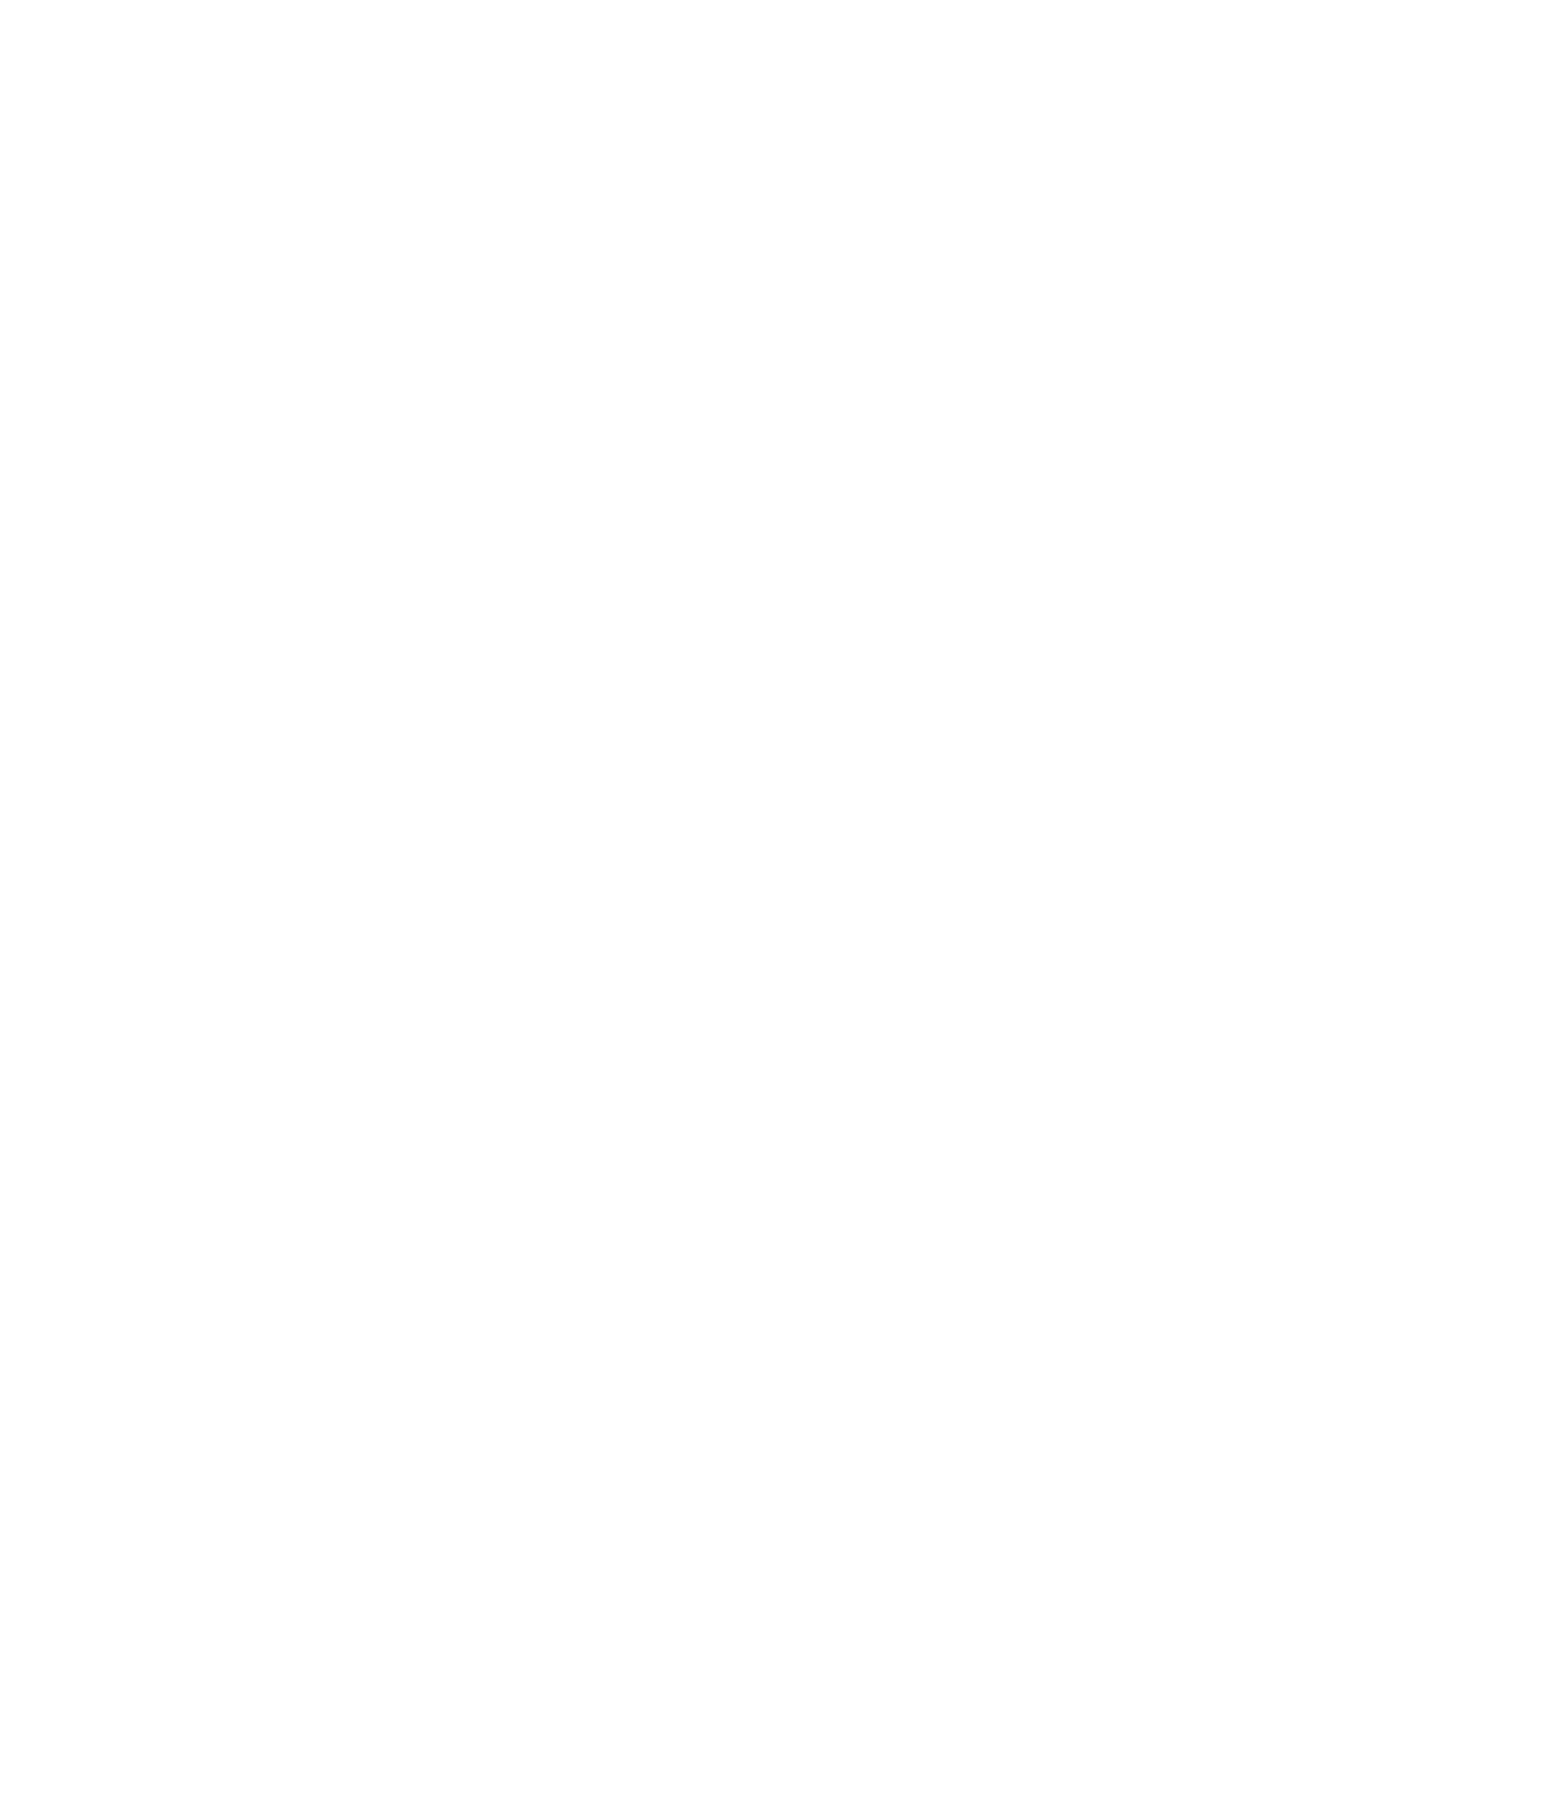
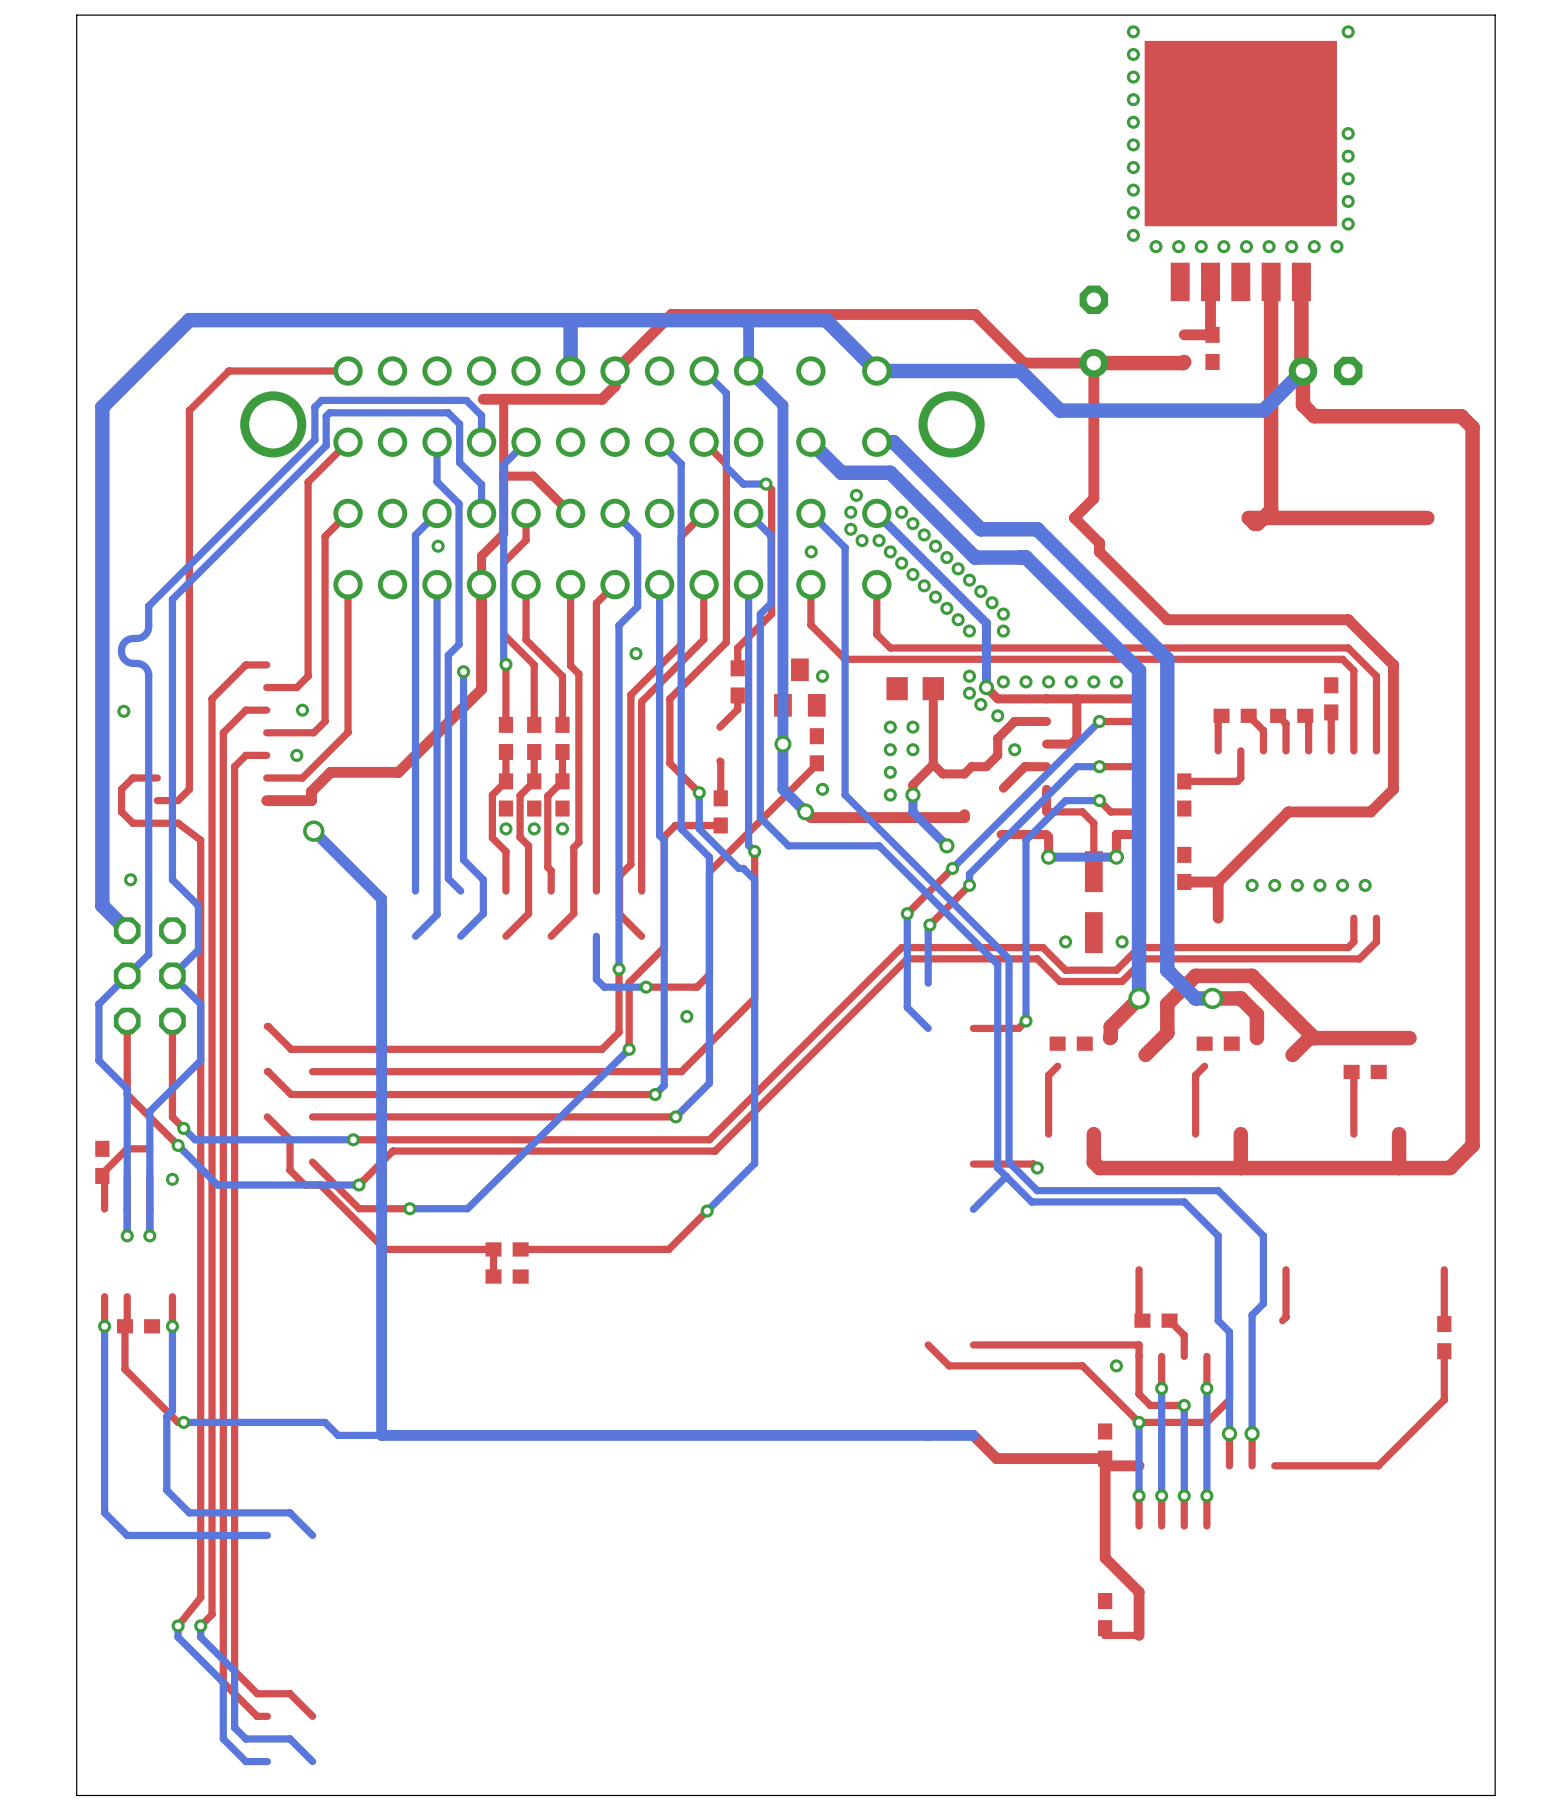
board edge: none -> (1495, 15) (76, 15) (76, 1795) (1495, 1795) (1495, 15)
via: none -> (1133, 31)
via: none -> (1348, 31)
via: none -> (1133, 54)
via: none -> (1133, 77)
via: none -> (1133, 99)
via: none -> (1133, 122)
via: none -> (1348, 133)
via: none -> (1133, 144)
via: none -> (1348, 156)
via: none -> (1133, 167)
part: none -> (1240, 171)
via: none -> (1348, 178)
via: none -> (1133, 190)
via: none -> (1348, 201)
via: none -> (1133, 212)
via: none -> (1348, 224)
via: none -> (1133, 235)
via: none -> (1156, 246)
via: none -> (1178, 246)
via: none -> (1201, 246)
via: none -> (1223, 246)
via: none -> (1246, 246)
via: none -> (1269, 246)
via: none -> (1291, 246)
via: none -> (1314, 246)
via: none -> (1336, 246)
top track: none -> (1210, 281) (1210, 331) (1212, 334) (1184, 334)
top track: none -> (1271, 281) (1271, 510) (1257, 523) (1254, 523) (1248, 517) (1427, 517)
top track: none -> (1301, 281) (1302, 404) (1314, 416) (1461, 416) (1472, 427) (1472, 1145) (1449, 1168) (1099, 1168) (1093, 1162) (1093, 1134)
bottom track: none -> (568, 320) (570, 322) (570, 371)
bottom track: none -> (743, 320) (748, 325) (748, 371) (782, 405) (782, 789) (805, 811)
part: none -> (1093, 331)
part: none -> (1212, 348)
top track: none -> (1184, 361) (1093, 363)
top track: none -> (1093, 363) (1093, 498) (1074, 517) (1099, 543) (1099, 551) (1167, 619) (1348, 619) (1393, 664) (1393, 789) (1370, 811) (1288, 811) (1218, 882)
top track: none -> (1093, 363) (1023, 363) (975, 314) (671, 314) (615, 371) (615, 386) (602, 399) (481, 399)
top track: none -> (348, 371) (228, 371) (189, 410) (189, 789) (178, 800) (157, 800)
bottom track: none -> (704, 371) (726, 393) (726, 467) (743, 484) (765, 484)
bottom track: none -> (1302, 371) (1263, 410) (1059, 410) (1020, 371) (876, 371) (825, 320) (189, 320) (102, 407) (102, 905) (127, 930)
part: none -> (1325, 371)
top track: none -> (503, 399) (503, 533) (481, 555) (481, 689) (398, 772) (330, 772) (311, 791) (311, 800) (266, 800)
top track: none -> (348, 442) (308, 482) (308, 676) (296, 687) (266, 687)
bottom track: none -> (437, 442) (437, 481) (459, 503) (459, 644) (448, 655) (448, 878) (460, 891)
bottom track: none -> (481, 442) (481, 415) (466, 400) (321, 400) (314, 407) (314, 439) (148, 606) (148, 628) (145, 634) (139, 638) (128, 639) (122, 645) (121, 653) (124, 659) (142, 665) (148, 673) (148, 954) (98, 1004) (98, 1060) (127, 1088) (127, 1235)
bottom track: none -> (526, 442) (503, 464) (503, 662) (505, 664)
bottom track: none -> (659, 442) (681, 463) (681, 828) (709, 857) (709, 1083) (675, 1116)
top track: none -> (704, 442) (726, 464) (726, 642) (669, 698) (669, 763) (699, 792)
bottom track: none -> (810, 442) (841, 472) (890, 472) (975, 557) (1025, 557) (1139, 670) (1139, 998)
bottom track: none -> (876, 442) (893, 442) (980, 529) (1037, 529) (1167, 659) (1167, 970) (1195, 998) (1212, 998)
top track: none -> (503, 476) (533, 476) (570, 513)
part: none -> (612, 477)
top track: none -> (765, 484) (771, 489) (771, 614) (737, 647) (737, 668)
via: none -> (765, 484)
via: none -> (856, 495)
via: none -> (850, 512)
via: none -> (901, 512)
top track: none -> (348, 513) (325, 536) (325, 721) (313, 732) (266, 732)
bottom track: none -> (437, 513) (415, 534) (415, 891)
bottom track: none -> (481, 513) (481, 484) (459, 462) (459, 424) (448, 412) (329, 412) (326, 416) (326, 445) (172, 599) (172, 879) (198, 905) (198, 949) (172, 975) (200, 1004) (200, 1060) (149, 1111) (149, 1235)
top track: none -> (526, 513) (526, 540) (503, 562) (503, 634) (534, 664) (534, 724)
bottom track: none -> (615, 513) (637, 536) (637, 606) (619, 625) (619, 969)
top track: none -> (704, 513) (681, 536) (681, 644) (630, 694) (630, 864) (619, 875) (619, 914) (641, 936)
bottom track: none -> (748, 513) (771, 535) (771, 603) (760, 614) (760, 817) (788, 845) (879, 845) (997, 964) (997, 1168) (1031, 1201) (1184, 1201) (1218, 1235) (1218, 1320) (1229, 1331) (1229, 1433)
bottom track: none -> (810, 513) (845, 547) (845, 794) (1009, 958) (1009, 1162) (1037, 1190) (1218, 1190) (1263, 1235) (1263, 1303) (1252, 1315) (1252, 1433)
bottom track: none -> (876, 513) (986, 623) (986, 687)
via: none -> (912, 523)
via: none -> (850, 529)
via: none -> (924, 534)
via: none -> (862, 540)
via: none -> (879, 540)
via: none -> (438, 546)
via: none -> (935, 546)
via: none -> (811, 551)
via: none -> (890, 551)
via: none -> (946, 557)
via: none -> (901, 563)
via: none -> (958, 568)
via: none -> (912, 574)
via: none -> (969, 580)
top track: none -> (348, 584) (348, 732) (302, 777) (266, 777)
bottom track: none -> (437, 584) (437, 914) (415, 936)
top track: none -> (526, 584) (526, 639) (562, 676) (562, 724)
top track: none -> (570, 584) (570, 665) (578, 673) (578, 842) (573, 847) (573, 913) (551, 936)
top track: none -> (615, 584) (596, 603) (596, 891)
bottom track: none -> (659, 584) (659, 835) (664, 840) (664, 1085) (655, 1094)
top track: none -> (704, 584) (703, 639) (641, 701) (641, 891)
bottom track: none -> (748, 584) (748, 845) (754, 851)
top track: none -> (810, 584) (810, 625) (845, 659) (1342, 659) (1353, 670) (1353, 750)
top track: none -> (876, 584) (876, 634) (890, 647) (1348, 647) (1376, 676) (1376, 750)
via: none -> (924, 585)
via: none -> (980, 591)
via: none -> (935, 597)
via: none -> (992, 602)
via: none -> (946, 608)
via: none -> (1003, 614)
via: none -> (958, 619)
via: none -> (969, 631)
via: none -> (1003, 631)
via: none -> (635, 653)
top track: none -> (266, 664) (245, 664) (212, 698) (212, 1614) (200, 1625)
top track: none -> (505, 664) (505, 724)
via: none -> (505, 664)
bottom track: none -> (463, 671) (463, 859) (483, 879) (483, 913) (460, 936)
via: none -> (463, 671)
via: none -> (822, 676)
via: none -> (969, 676)
part: none -> (737, 681)
via: none -> (1003, 681)
via: none -> (1025, 681)
via: none -> (1048, 681)
via: none -> (1071, 681)
via: none -> (1093, 681)
via: none -> (1116, 681)
part: none -> (799, 687)
top track: none -> (986, 687) (997, 698) (1134, 698)
via: none -> (986, 687)
part: none -> (915, 688)
top track: none -> (933, 688) (933, 764)
via: none -> (969, 693)
top track: none -> (737, 695) (737, 709) (719, 727)
top track: none -> (1076, 698) (1076, 738) (1071, 744) (1046, 744)
part: none -> (1331, 698)
via: none -> (980, 704)
top track: none -> (266, 710) (245, 710) (223, 732) (223, 1682) (257, 1716) (267, 1716)
via: none -> (302, 710)
via: none -> (123, 711)
top track: none -> (1331, 712) (1331, 750)
via: none -> (997, 715)
top track: none -> (1221, 715) (1218, 719) (1218, 750)
part: none -> (1235, 715)
top track: none -> (1248, 715) (1263, 730) (1263, 750)
top track: none -> (1278, 715) (1286, 723) (1286, 750)
part: none -> (1291, 715)
top track: none -> (1305, 715) (1308, 719) (1308, 750)
top track: none -> (1046, 721) (1014, 721) (997, 738) (997, 755) (986, 766) (971, 766) (964, 773) (942, 773) (933, 764)
bottom track: none -> (1099, 721) (952, 868)
via: none -> (1099, 721)
top track: none -> (1134, 721) (1099, 721)
via: none -> (890, 727)
via: none -> (912, 727)
part: none -> (505, 738)
part: none -> (534, 738)
part: none -> (562, 738)
via: none -> (782, 744)
part: none -> (816, 749)
via: none -> (890, 749)
via: none -> (912, 749)
via: none -> (1014, 749)
top track: none -> (1240, 750) (1240, 777) (1237, 781) (1184, 781)
top track: none -> (505, 751) (505, 781) (492, 794) (492, 837) (505, 851) (505, 891)
top track: none -> (534, 751) (534, 781) (520, 795) (520, 837) (528, 845) (528, 913) (505, 936)
top track: none -> (562, 751) (562, 781) (547, 796) (547, 867) (551, 870) (551, 891)
top track: none -> (266, 755) (245, 755) (234, 766) (234, 1671) (257, 1693) (290, 1693) (312, 1716)
via: none -> (296, 755)
top track: none -> (719, 760) (720, 798)
top track: none -> (816, 763) (709, 871) (709, 974) (697, 987) (646, 987)
top track: none -> (933, 764) (912, 784) (912, 794)
top track: none -> (1046, 766) (1024, 766) (1003, 788)
bottom track: none -> (1099, 766) (1076, 766) (969, 874) (969, 885)
via: none -> (1099, 766)
top track: none -> (1134, 766) (1099, 766)
via: none -> (890, 772)
top track: none -> (157, 777) (132, 777) (121, 789) (121, 811) (132, 823) (178, 823) (200, 840) (200, 1597) (178, 1625)
via: none -> (822, 789)
top track: none -> (1046, 789) (1046, 811) (1082, 811) (1093, 823) (1093, 871)
bottom track: none -> (699, 792) (699, 828) (738, 868) (743, 868) (754, 879) (754, 1163) (707, 1210)
via: none -> (699, 792)
part: none -> (505, 794)
part: none -> (534, 794)
part: none -> (562, 794)
via: none -> (890, 794)
bottom track: none -> (912, 794) (912, 811) (946, 845)
via: none -> (912, 794)
part: none -> (1184, 794)
bottom track: none -> (1099, 800) (1065, 800) (1025, 840) (1025, 1021)
top track: none -> (1099, 800) (1110, 811) (1134, 811)
via: none -> (1099, 800)
part: none -> (720, 811)
top track: none -> (805, 811) (811, 817) (964, 817) (964, 814)
via: none -> (805, 811)
top track: none -> (720, 825) (675, 825) (664, 836) (664, 947) (629, 982) (629, 1049)
via: none -> (505, 828)
via: none -> (534, 828)
via: none -> (562, 828)
bottom track: none -> (313, 831) (381, 898) (381, 1435)
via: none -> (313, 831)
top track: none -> (1001, 834) (1046, 834) (1048, 836) (1048, 857)
top track: none -> (1134, 834) (1116, 834) (1116, 857)
via: none -> (946, 845)
top track: none -> (754, 851) (754, 998) (681, 1071) (312, 1071)
via: none -> (754, 851)
via: none -> (1048, 857)
bottom track: none -> (1116, 857) (1048, 857)
via: none -> (1116, 857)
top track: none -> (952, 868) (907, 913)
via: none -> (952, 868)
part: none -> (1184, 868)
via: none -> (130, 879)
top track: none -> (1218, 882) (1184, 882)
top track: none -> (1218, 882) (1218, 918)
top track: none -> (969, 885) (929, 924)
via: none -> (969, 885)
via: none -> (1252, 885)
via: none -> (1274, 885)
via: none -> (1297, 885)
via: none -> (1319, 885)
via: none -> (1342, 885)
via: none -> (1365, 885)
part: none -> (1093, 902)
bottom track: none -> (907, 913) (907, 1007) (928, 1028)
via: none -> (907, 913)
top track: none -> (1353, 918) (1353, 941) (1348, 947) (1139, 947) (1116, 970) (1065, 970) (1042, 947) (901, 947) (709, 1139) (353, 1139)
top track: none -> (1376, 918) (1376, 941) (1359, 958) (1144, 958) (1122, 981) (1059, 981) (1037, 958) (907, 958) (715, 1151) (392, 1151) (358, 1184)
bottom track: none -> (929, 924) (928, 926) (928, 983)
via: none -> (929, 924)
bottom track: none -> (596, 936) (596, 979) (604, 987) (646, 987)
via: none -> (1065, 941)
via: none -> (1122, 941)
top track: none -> (619, 969) (619, 1032) (602, 1049) (291, 1049) (267, 1026)
via: none -> (619, 969)
part: none -> (149, 975)
via: none -> (646, 987)
top track: none -> (1139, 998) (1110, 1026) (1109, 1038)
via: none -> (1139, 998)
top track: none -> (1212, 998) (1240, 998) (1256, 1014) (1256, 1038)
via: none -> (1212, 998)
via: none -> (686, 1016)
top track: none -> (127, 1021) (127, 1094) (178, 1145)
top track: none -> (172, 1021) (172, 1117) (183, 1128)
top track: none -> (1025, 1021) (1018, 1028) (973, 1028)
via: none -> (1025, 1021)
top track: none -> (1314, 1038) (1252, 975) (1195, 975) (1167, 1004) (1167, 1033) (1145, 1054)
top track: none -> (1409, 1038) (1309, 1038) (1292, 1054)
part: none -> (1071, 1043)
part: none -> (1218, 1043)
bottom track: none -> (629, 1049) (467, 1208) (409, 1208)
via: none -> (629, 1049)
top track: none -> (1057, 1066) (1048, 1075) (1048, 1134)
top track: none -> (1204, 1066) (1195, 1075) (1195, 1134)
top track: none -> (267, 1071) (291, 1094) (655, 1094)
top track: none -> (1351, 1071) (1353, 1071) (1353, 1134)
part: none -> (1365, 1071)
via: none -> (655, 1094)
top track: none -> (267, 1116) (290, 1139) (290, 1170) (304, 1184) (320, 1184) (384, 1249) (493, 1249) (493, 1276)
top track: none -> (675, 1116) (312, 1116)
via: none -> (675, 1116)
bottom track: none -> (183, 1128) (195, 1139) (353, 1139)
via: none -> (183, 1128)
top track: none -> (1240, 1134) (1240, 1168)
top track: none -> (1399, 1134) (1399, 1168)
via: none -> (353, 1139)
bottom track: none -> (178, 1145) (217, 1184) (358, 1184)
via: none -> (178, 1145)
top track: none -> (149, 1148) (127, 1148) (100, 1175) (104, 1178) (104, 1208)
part: none -> (102, 1162)
top track: none -> (312, 1162) (359, 1208) (409, 1208)
top track: none -> (973, 1164) (1033, 1164) (1037, 1168)
via: none -> (1037, 1168)
bottom track: none -> (1006, 1176) (973, 1209)
via: none -> (172, 1179)
via: none -> (358, 1184)
via: none -> (409, 1208)
top track: none -> (707, 1210) (668, 1249) (520, 1249)
via: none -> (707, 1210)
via: none -> (127, 1235)
via: none -> (149, 1235)
part: none -> (507, 1249)
top track: none -> (1139, 1269) (1139, 1317) (1142, 1320)
top track: none -> (1286, 1269) (1286, 1317) (1282, 1320)
top track: none -> (1444, 1269) (1444, 1324)
part: none -> (507, 1276)
top track: none -> (104, 1296) (104, 1326)
top track: none -> (127, 1296) (124, 1369) (178, 1422) (183, 1422)
top track: none -> (172, 1296) (172, 1326)
part: none -> (1156, 1320)
top track: none -> (1169, 1320) (1184, 1335) (1184, 1356)
bottom track: none -> (104, 1326) (104, 1512) (127, 1535) (267, 1535)
via: none -> (104, 1326)
part: none -> (138, 1326)
bottom track: none -> (172, 1326) (172, 1411) (166, 1416) (166, 1490) (189, 1512) (290, 1512) (312, 1535)
via: none -> (172, 1326)
part: none -> (1444, 1337)
top track: none -> (928, 1344) (949, 1365) (1082, 1365) (1139, 1422) (1206, 1422) (1229, 1399) (1229, 1356)
top track: none -> (973, 1344) (1139, 1344) (1139, 1394) (1150, 1405) (1184, 1405)
top track: none -> (1444, 1351) (1444, 1399) (1378, 1465) (1274, 1465)
top track: none -> (1161, 1356) (1161, 1388)
top track: none -> (1206, 1356) (1206, 1388)
via: none -> (1116, 1365)
bottom track: none -> (1161, 1388) (1161, 1495)
via: none -> (1161, 1388)
bottom track: none -> (1206, 1388) (1206, 1495)
via: none -> (1206, 1388)
bottom track: none -> (1184, 1405) (1184, 1495)
via: none -> (1184, 1405)
bottom track: none -> (183, 1422) (325, 1422) (338, 1435) (381, 1435)
via: none -> (183, 1422)
bottom track: none -> (1139, 1422) (1139, 1495)
via: none -> (1139, 1422)
top track: none -> (1229, 1433) (1229, 1465)
via: none -> (1229, 1433)
top track: none -> (1252, 1433) (1252, 1465)
via: none -> (1252, 1433)
bottom track: none -> (973, 1435) (381, 1435)
top track: none -> (973, 1435) (996, 1458) (1105, 1458) (1105, 1465)
part: none -> (1105, 1445)
top track: none -> (1105, 1465) (1105, 1558) (1139, 1591) (1139, 1635) (1105, 1635) (1105, 1628)
top track: none -> (1139, 1465) (1105, 1465)
top track: none -> (1139, 1495) (1139, 1525)
via: none -> (1139, 1495)
top track: none -> (1161, 1495) (1161, 1525)
via: none -> (1161, 1495)
top track: none -> (1184, 1495) (1184, 1525)
via: none -> (1184, 1495)
top track: none -> (1206, 1495) (1206, 1525)
via: none -> (1206, 1495)
part: none -> (1105, 1614)
bottom track: none -> (178, 1625) (178, 1637) (223, 1682) (223, 1738) (245, 1761) (267, 1761)
via: none -> (178, 1625)
bottom track: none -> (200, 1625) (200, 1637) (234, 1671) (234, 1727) (245, 1738) (290, 1738) (312, 1761)
via: none -> (200, 1625)

